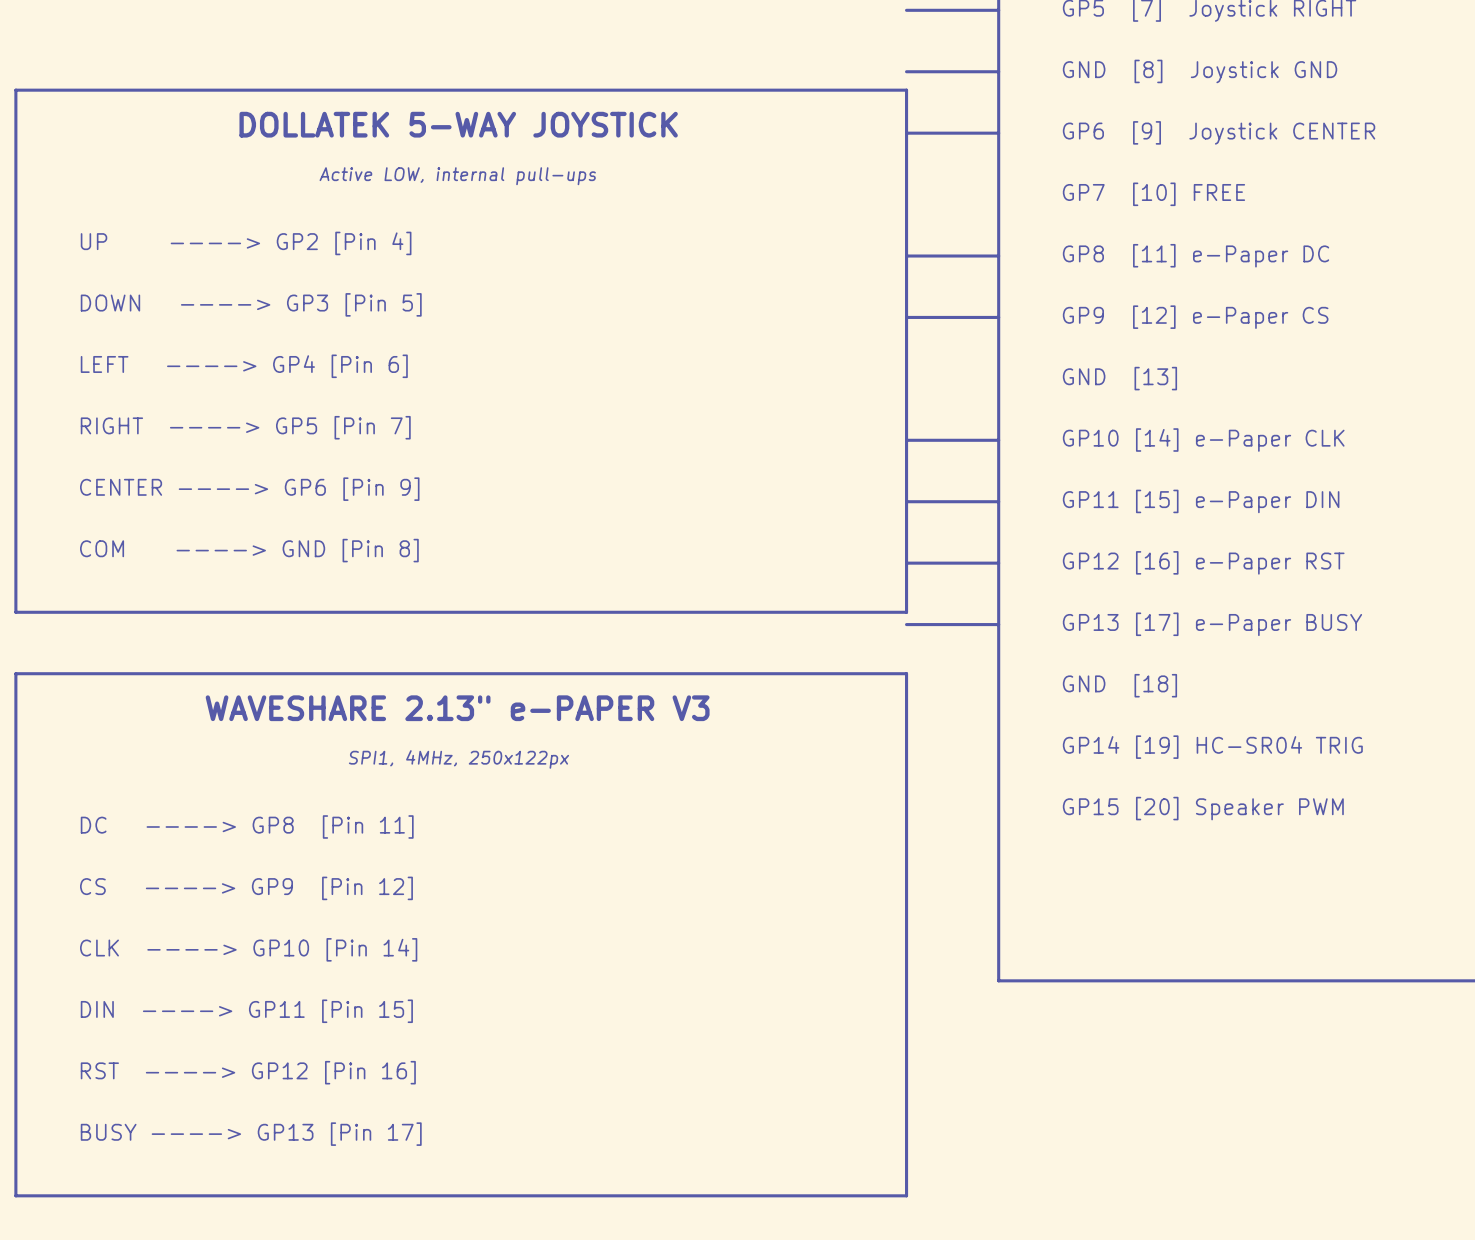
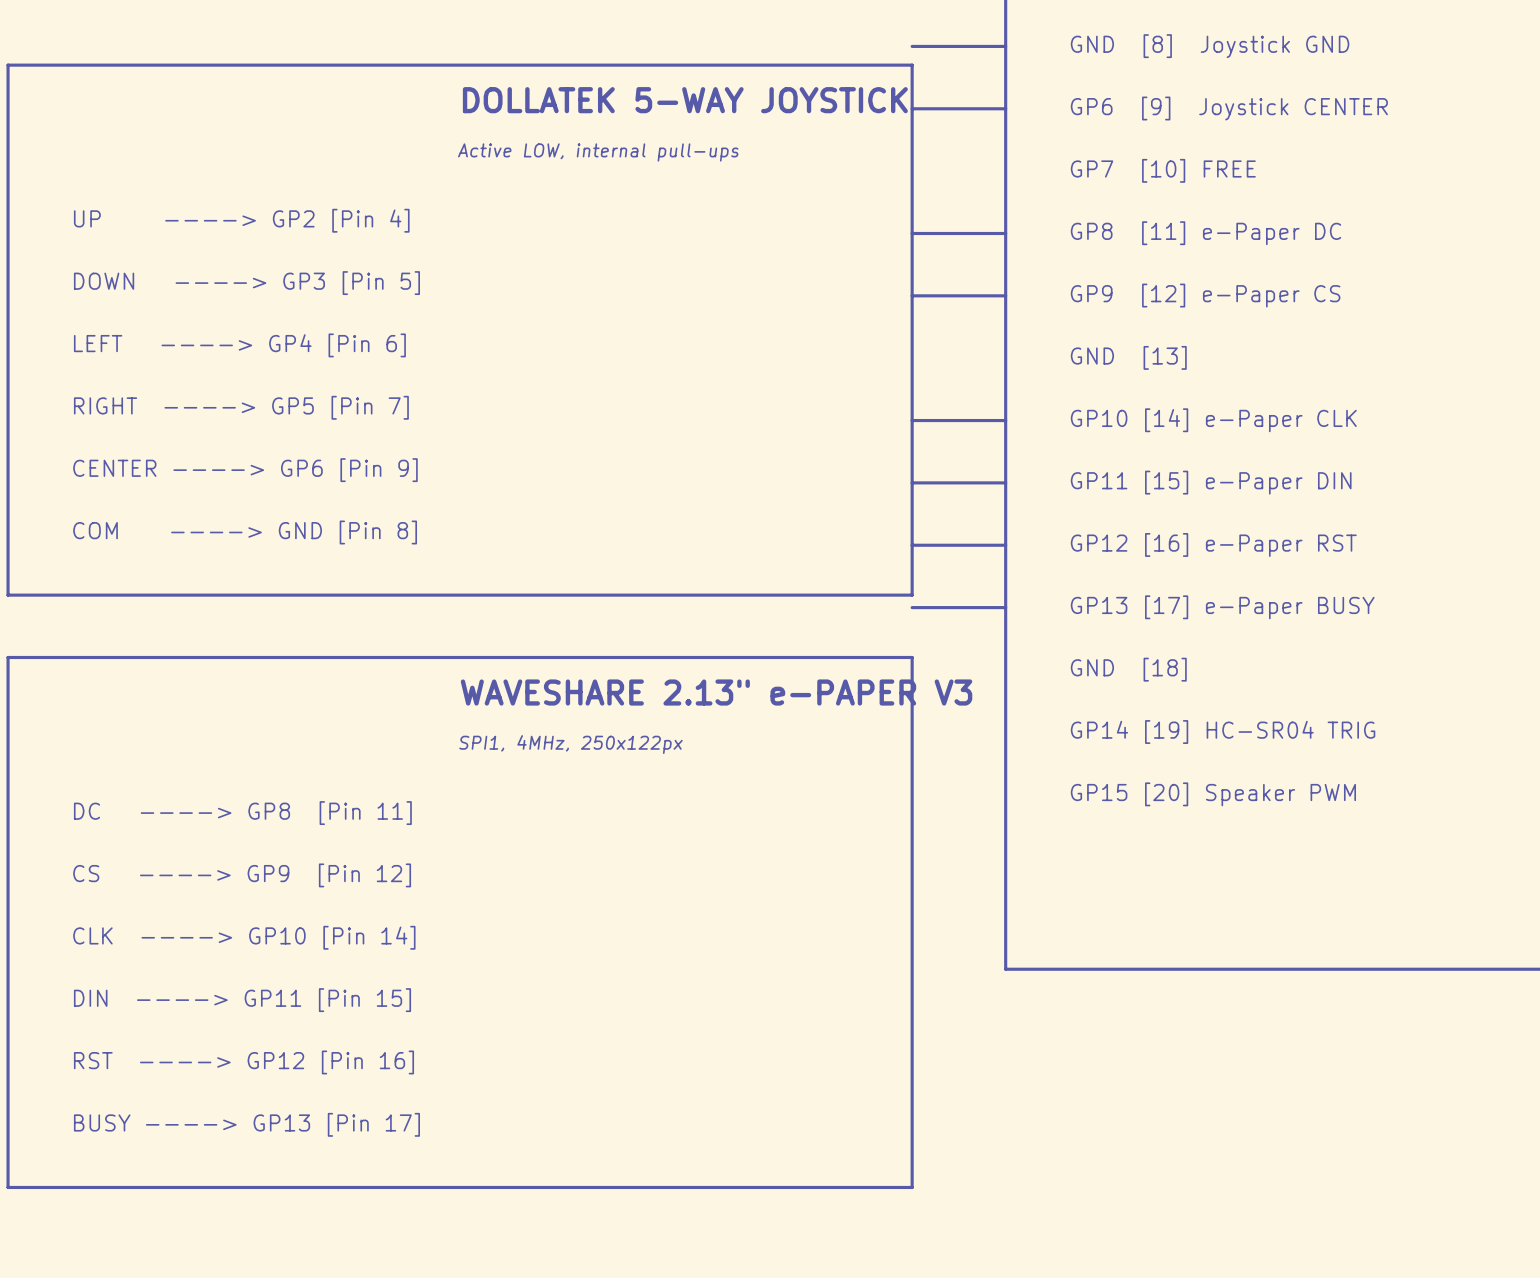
text position: DOLLATEK 5-WAY JOYSTICK (458, 124) -> DOLLATEK 5-WAY JOYSTICK (685, 100)
text position: Active LOW, internal pull-ups (457, 176) -> Active LOW, internal pull-ups (598, 152)
text position: WAVESHARE 2.13" e-PAPER V3 (457, 708) -> WAVESHARE 2.13" e-PAPER V3 (716, 692)
text position: SPI1, 4MHz, 250x122px (458, 759) -> SPI1, 4MHz, 250x122px (570, 744)

